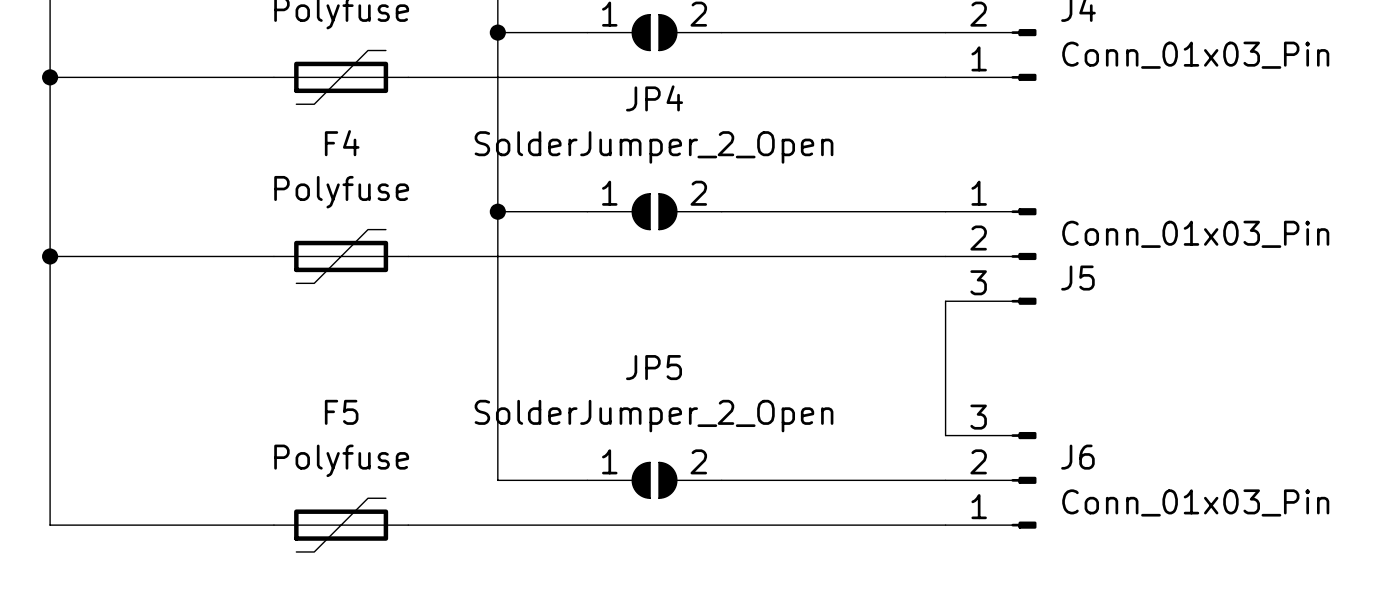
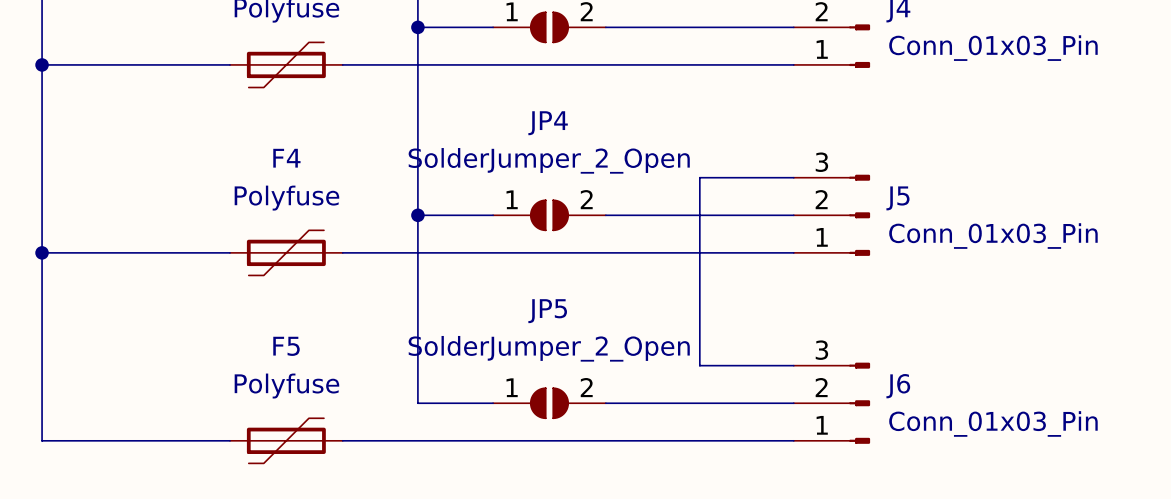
wire: (497, 211) (587, 211) -> none
junction position: (497, 211) -> (417, 215)
JP4 position: (654, 211) -> (549, 215)
wire: (721, 211) (833, 211) -> none
wire: (50, 256) (273, 256) -> (42, 252) (229, 252)
junction position: (50, 256) -> (42, 252)
F4 position: (341, 256) -> (286, 252)
wire: (408, 256) (497, 256) -> none
J5 flip: as is (1023, 256) -> up-down (859, 215)
wire: none -> (342, 252) (793, 252)
wire: (945, 301) (945, 435) -> (699, 177) (699, 365) (793, 365)

